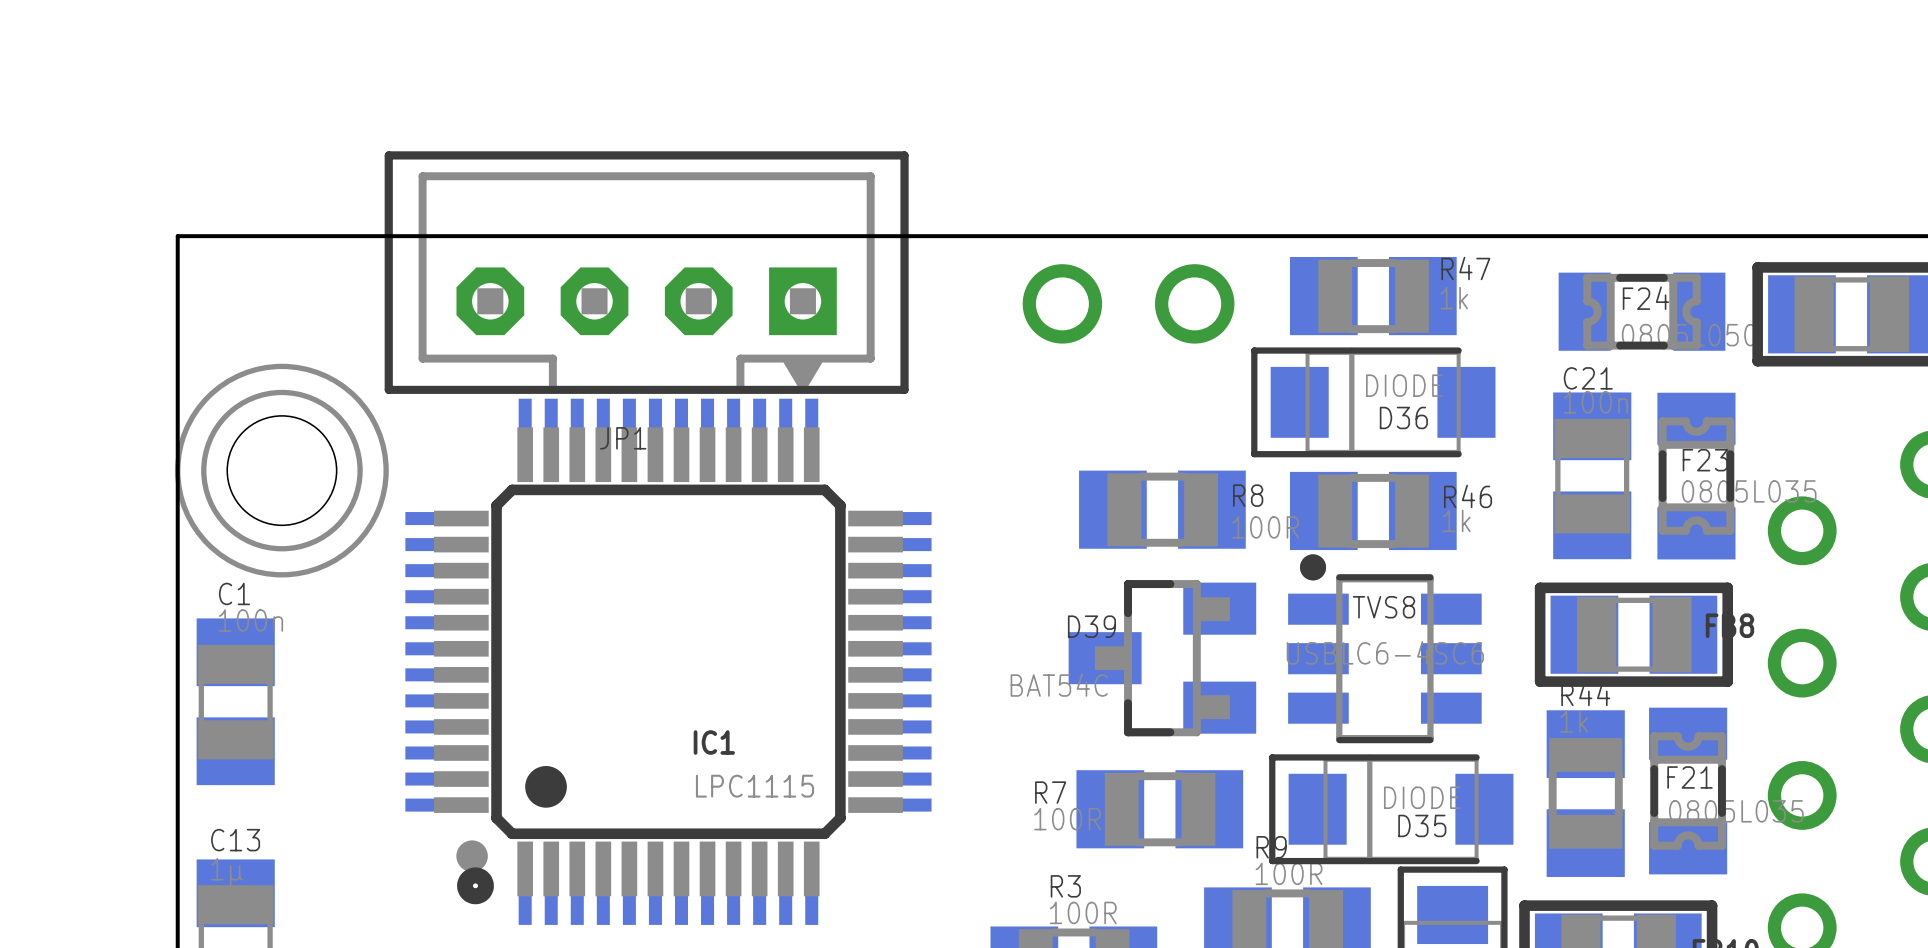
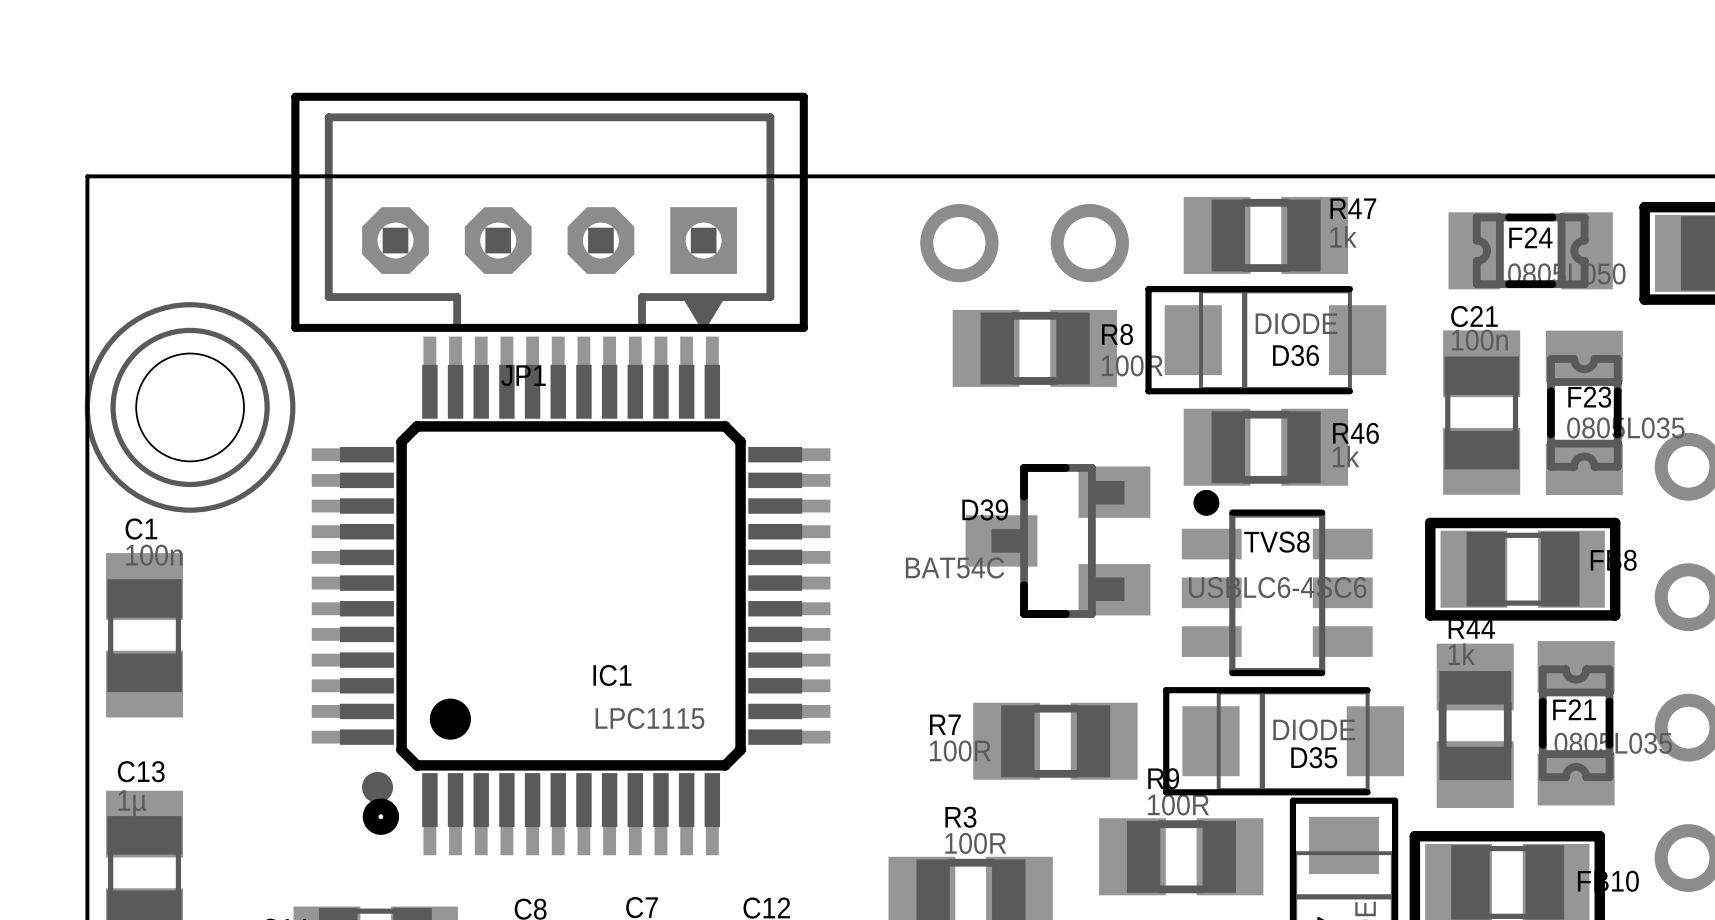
R8 position: (1162, 509) -> (1034, 348)
D39 position: (1162, 658) -> (1057, 540)

